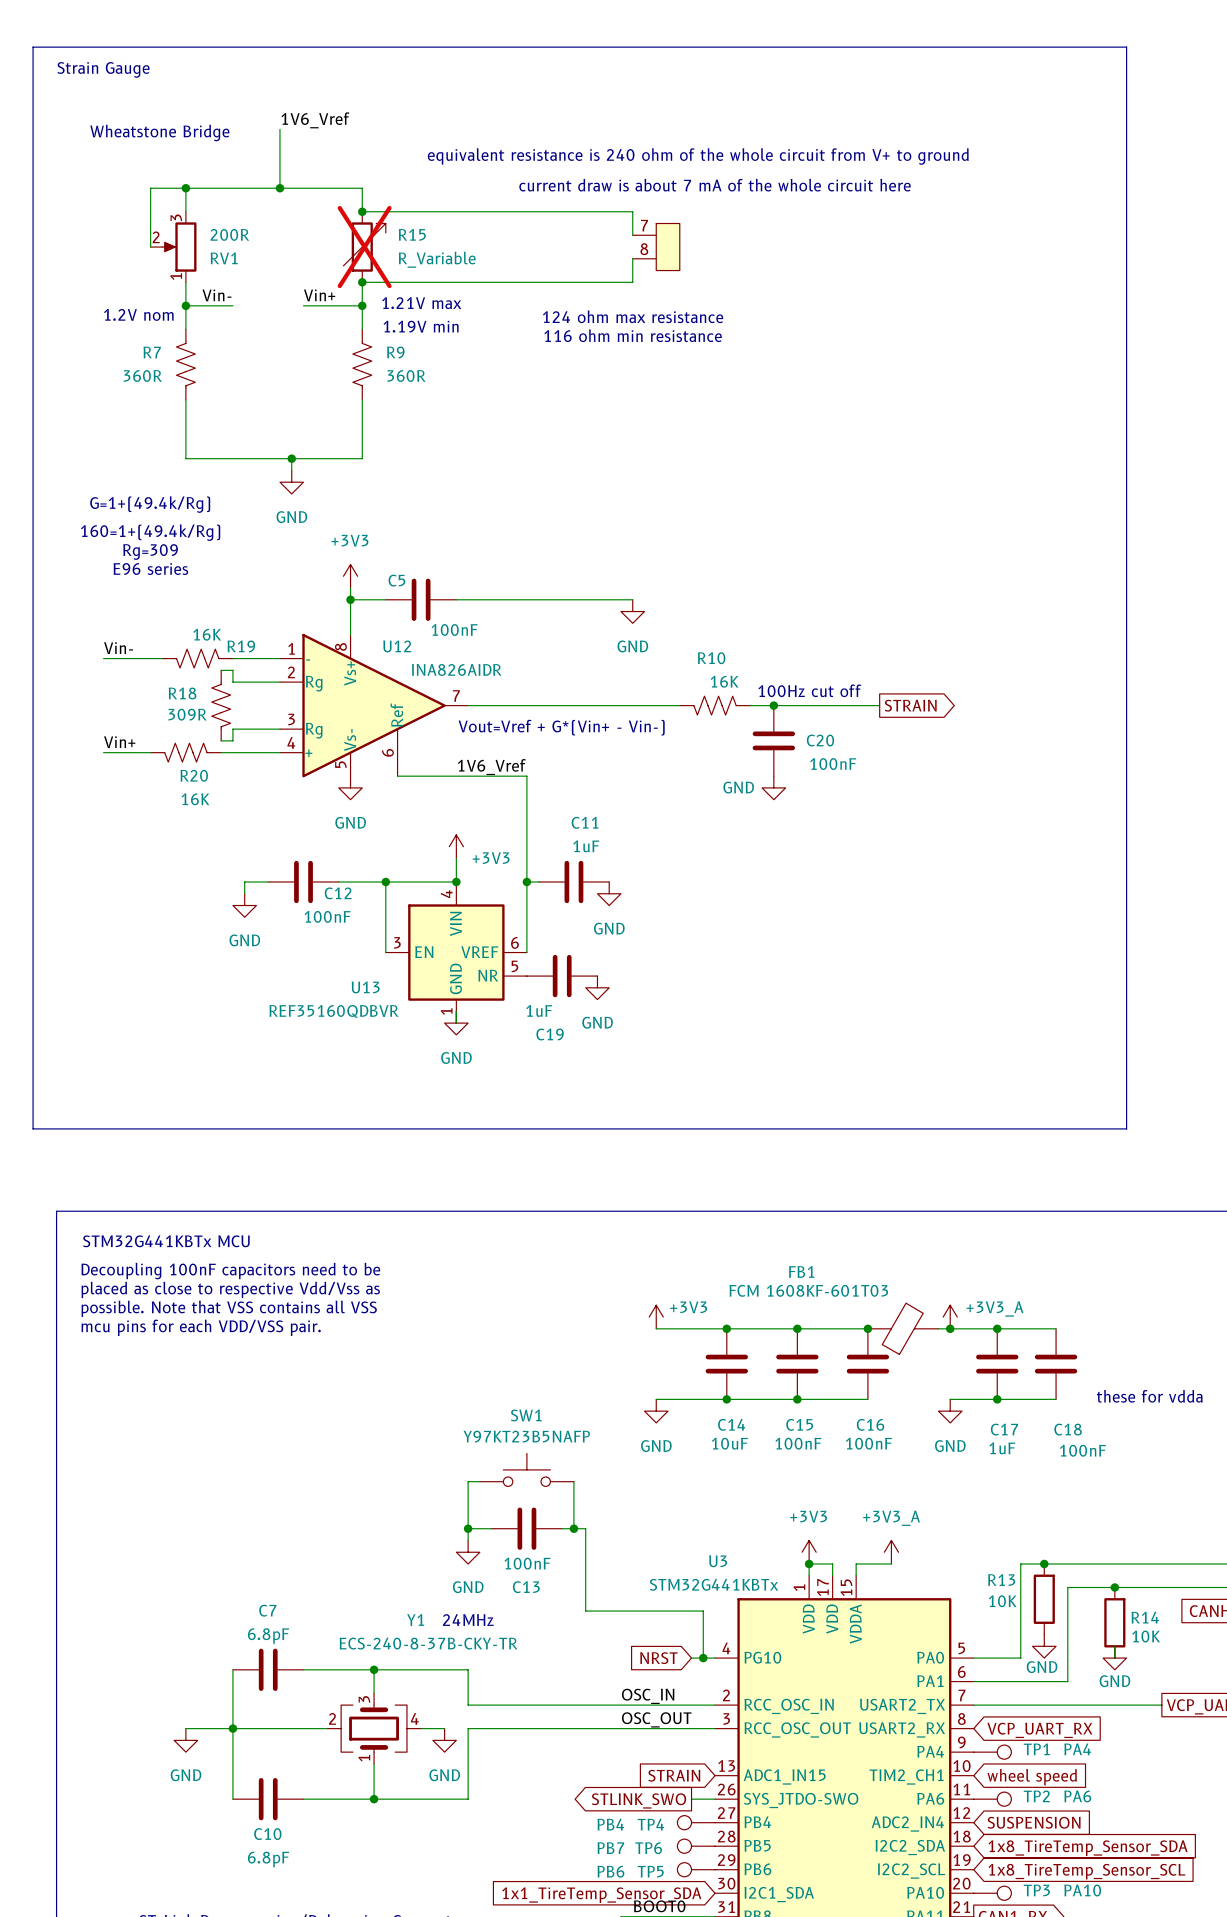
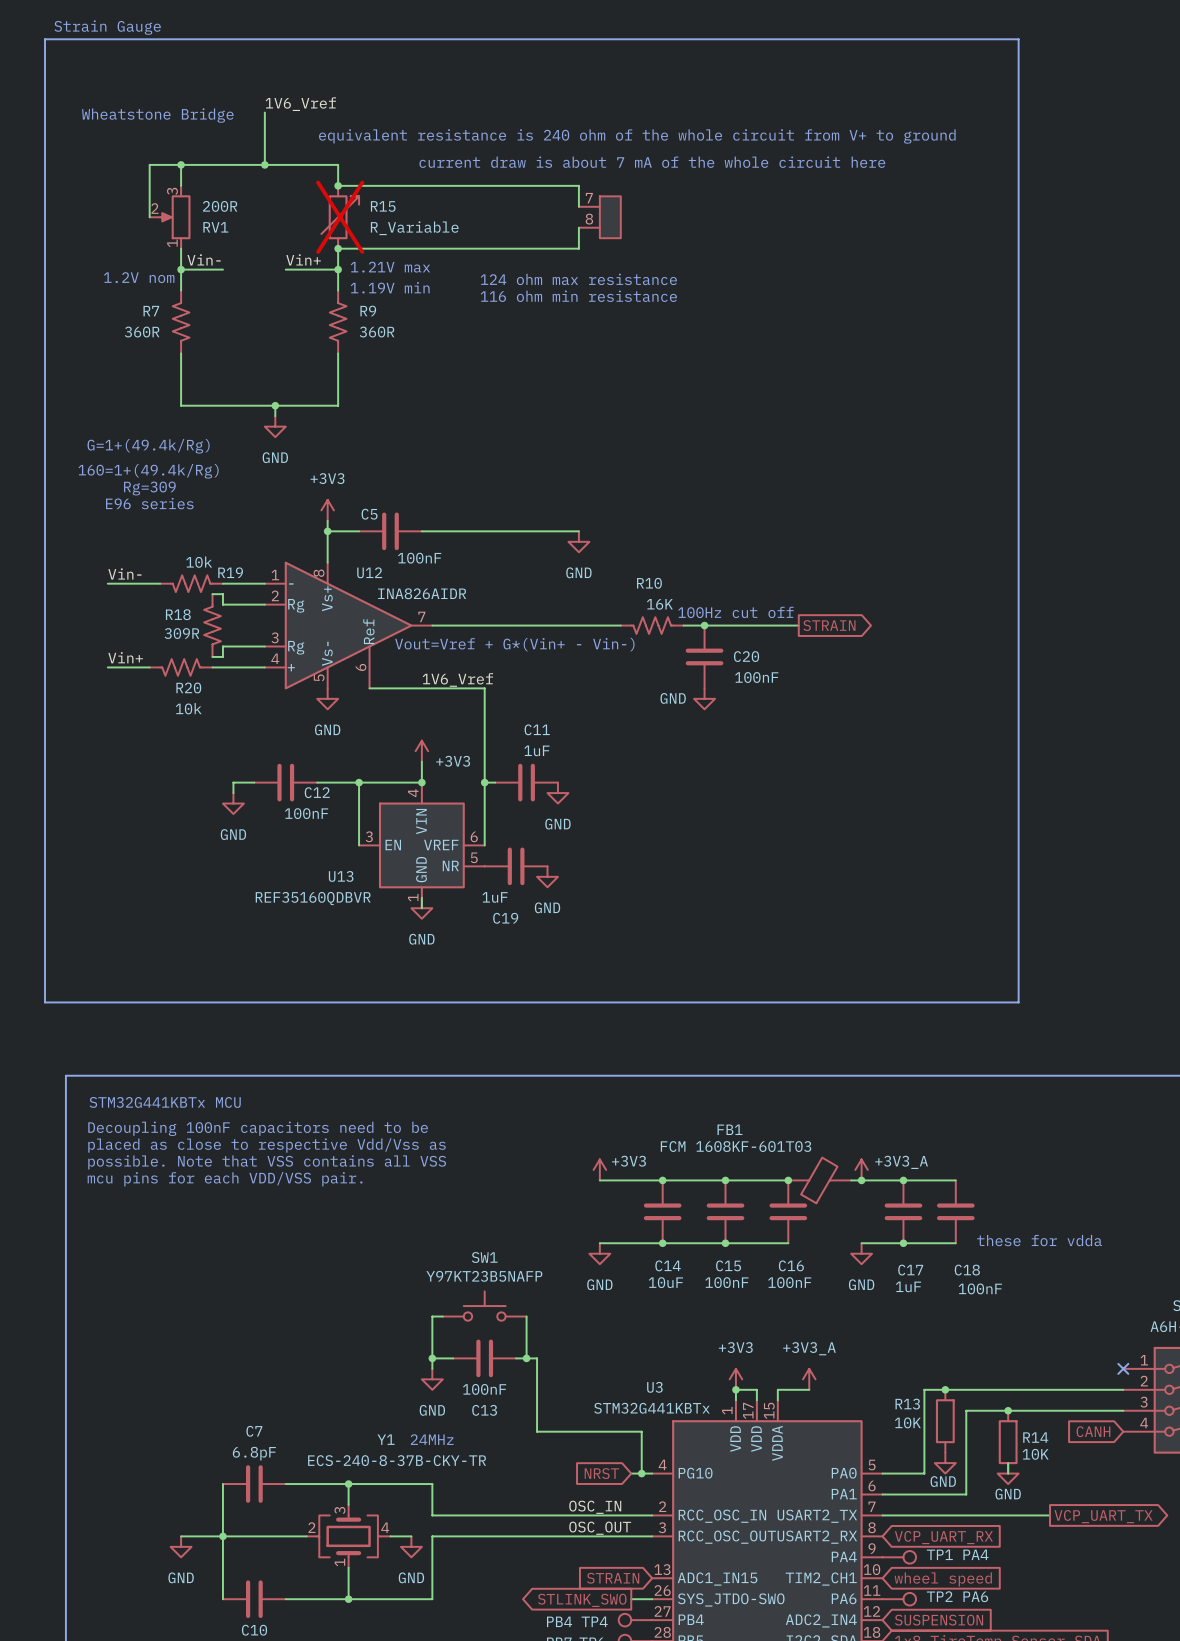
text position: Strain Gauge (103, 69) -> Strain Gauge (107, 27)
R19 value: 16K (207, 634) -> 10k (199, 562)
R20 value: 16K (195, 799) -> 10k (188, 708)

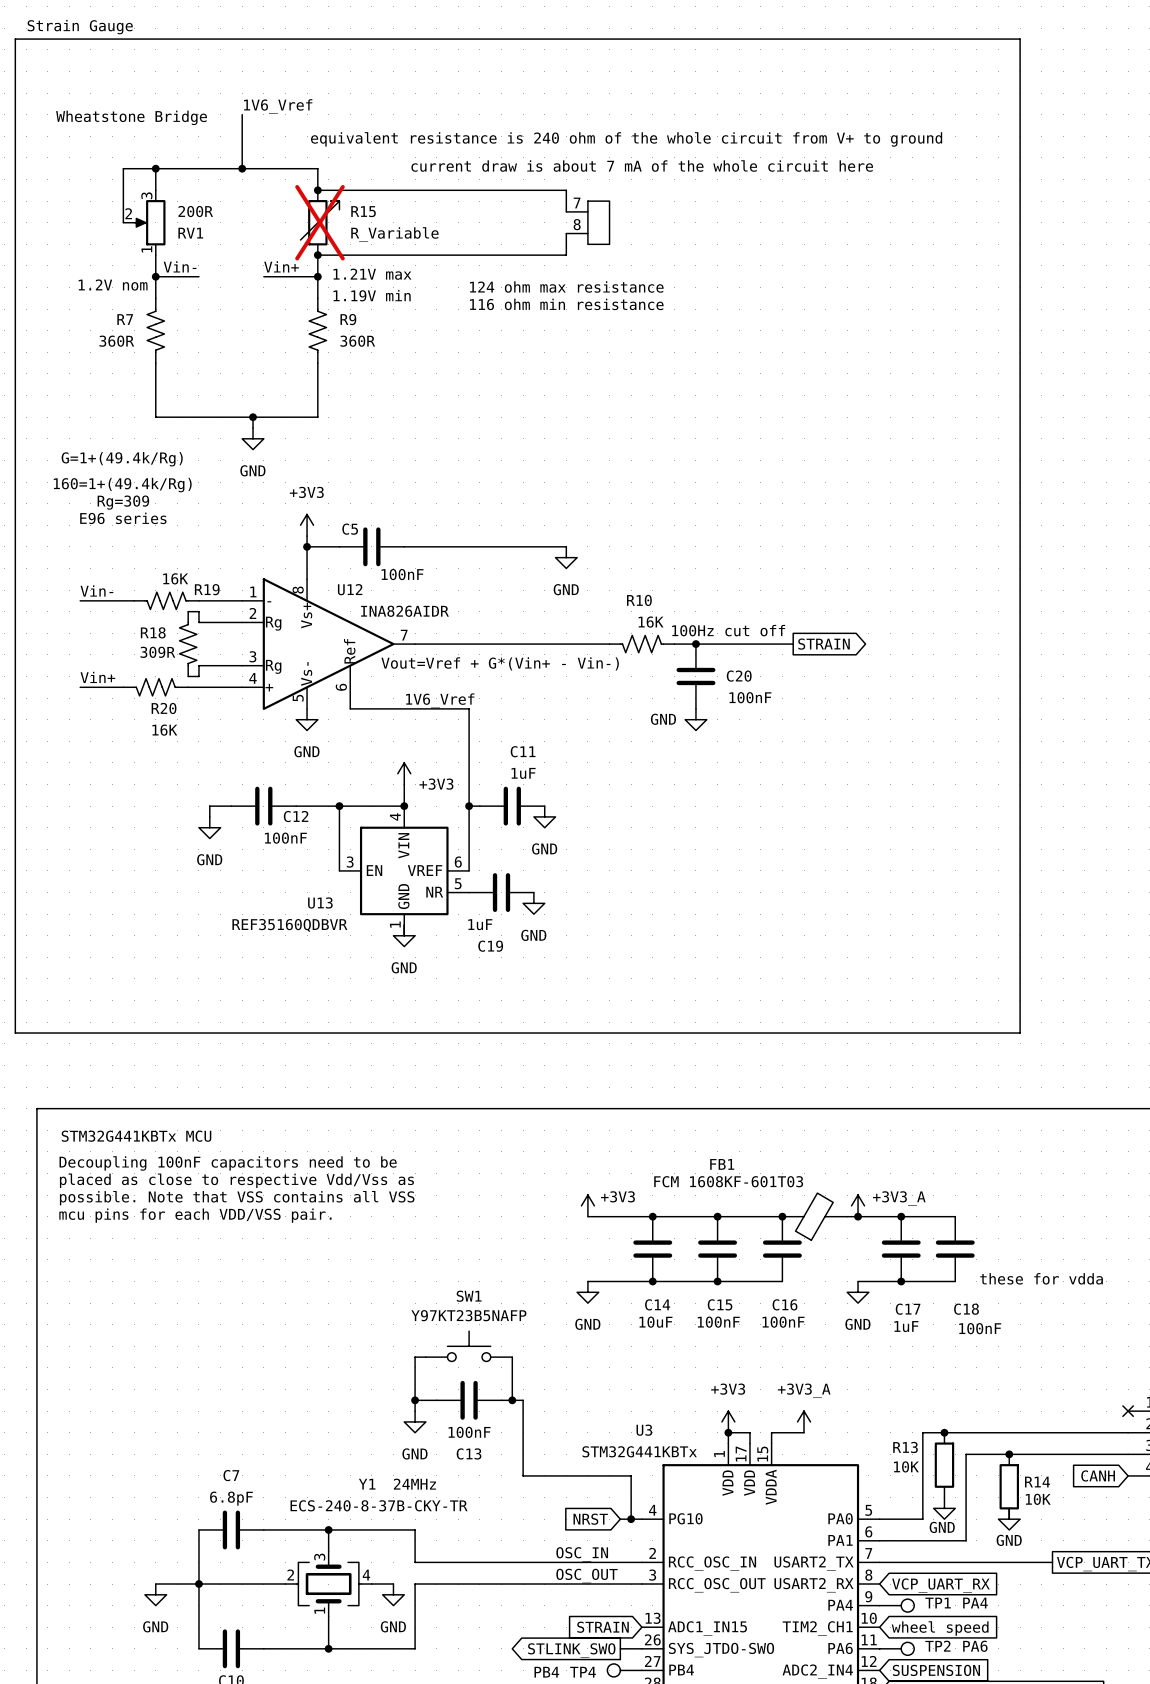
R19 value: 10k (199, 562) -> 16K (175, 578)
R20 value: 10k (188, 708) -> 16K (164, 730)

